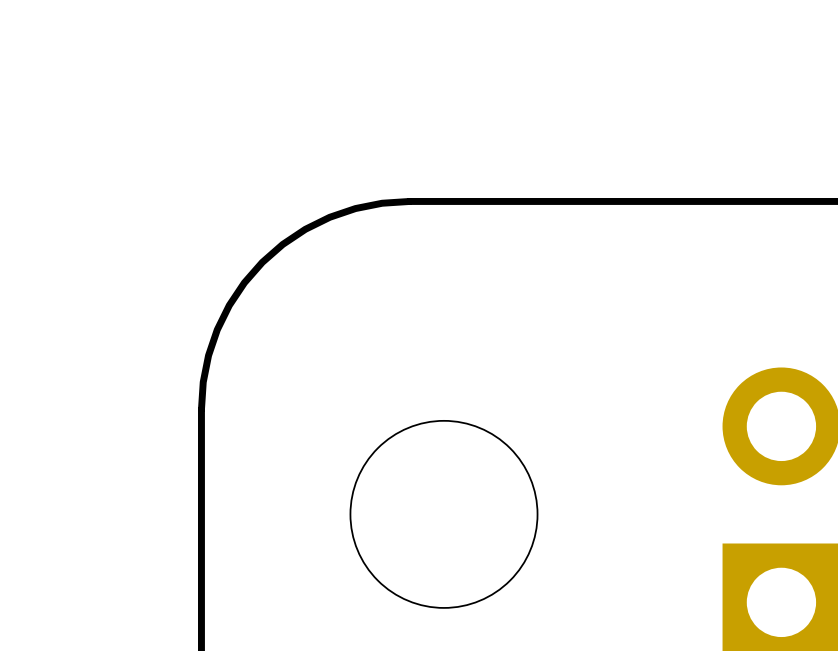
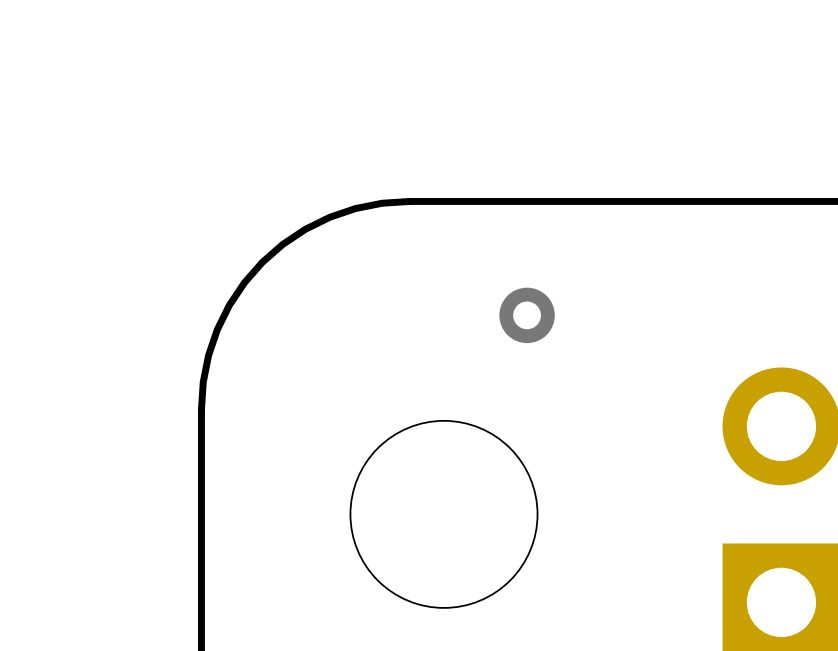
via: none -> (527, 315)

